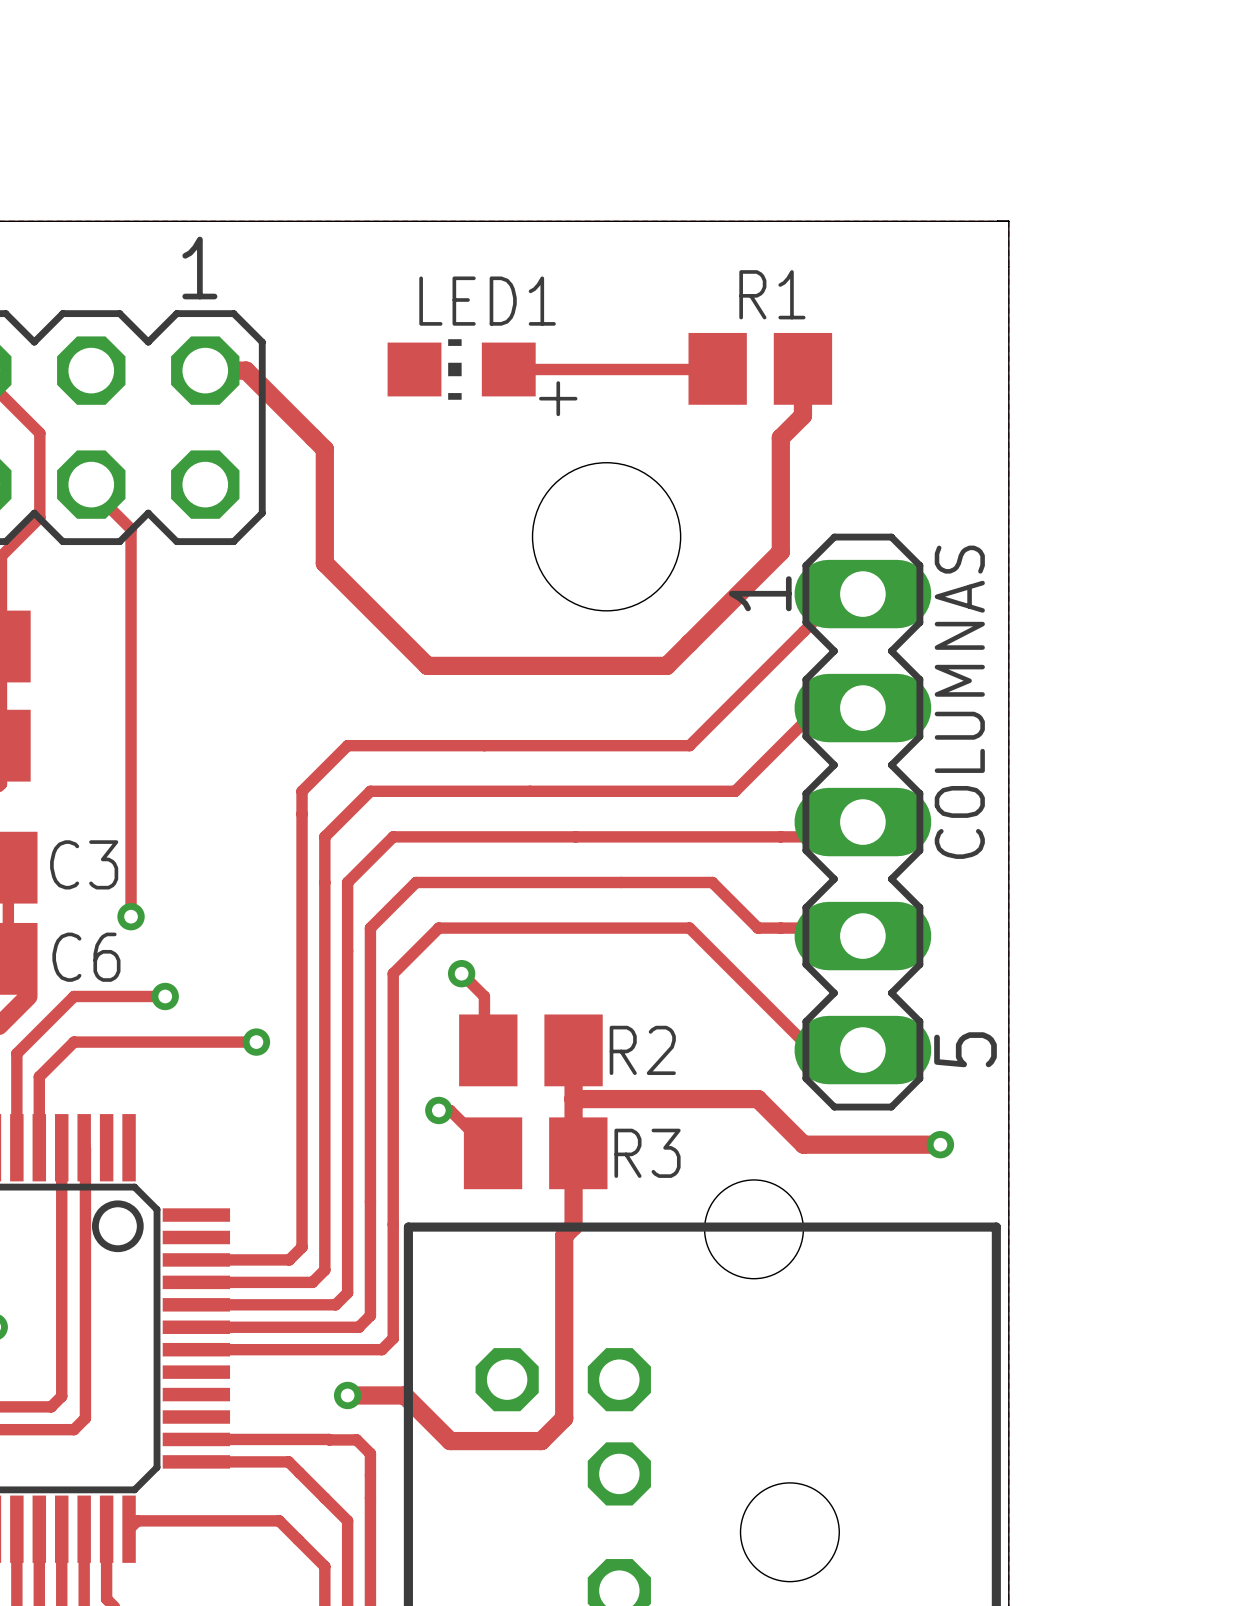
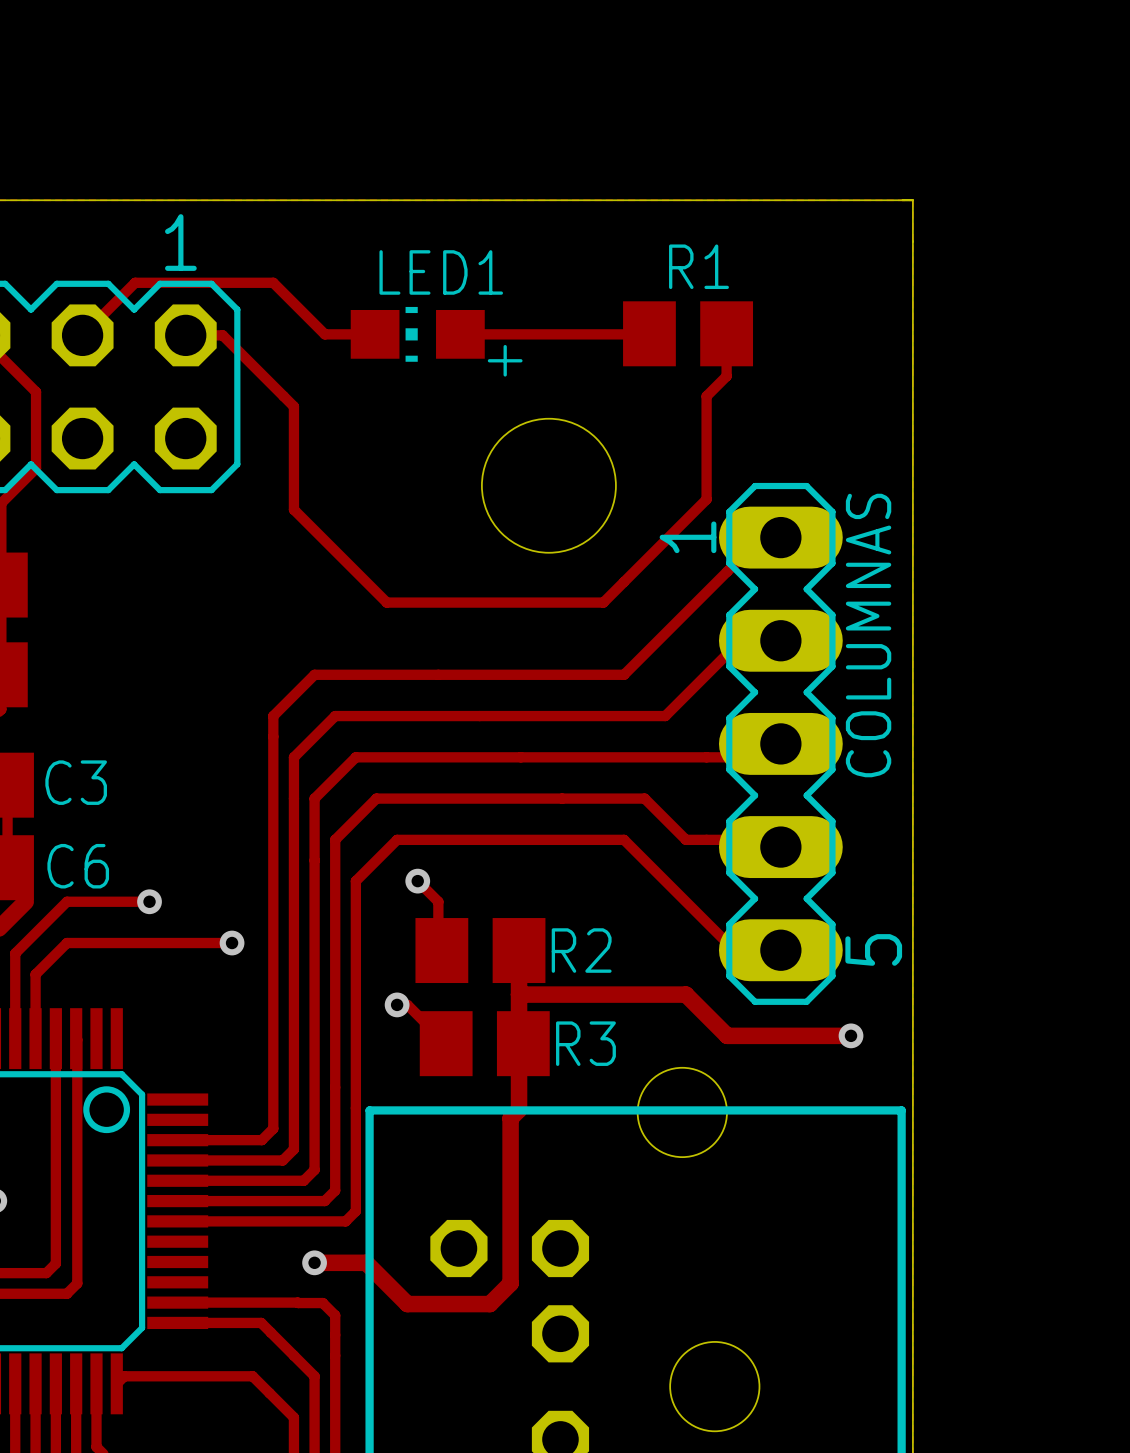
track width: thick (802, 368) (802, 415) (780, 437) (780, 551) (666, 665) (427, 665) (324, 563) (324, 449) (246, 370) (205, 370) -> thin (726, 333) (726, 376) (706, 396) (706, 499) (603, 602) (386, 602) (293, 509) (293, 406) (222, 335) (185, 335)
track: none -> (375, 334) (324, 334) (273, 282) (135, 282) (82, 335)
track: (91, 484) (91, 489) (131, 529) (131, 916) -> none
via: (131, 916) -> none

